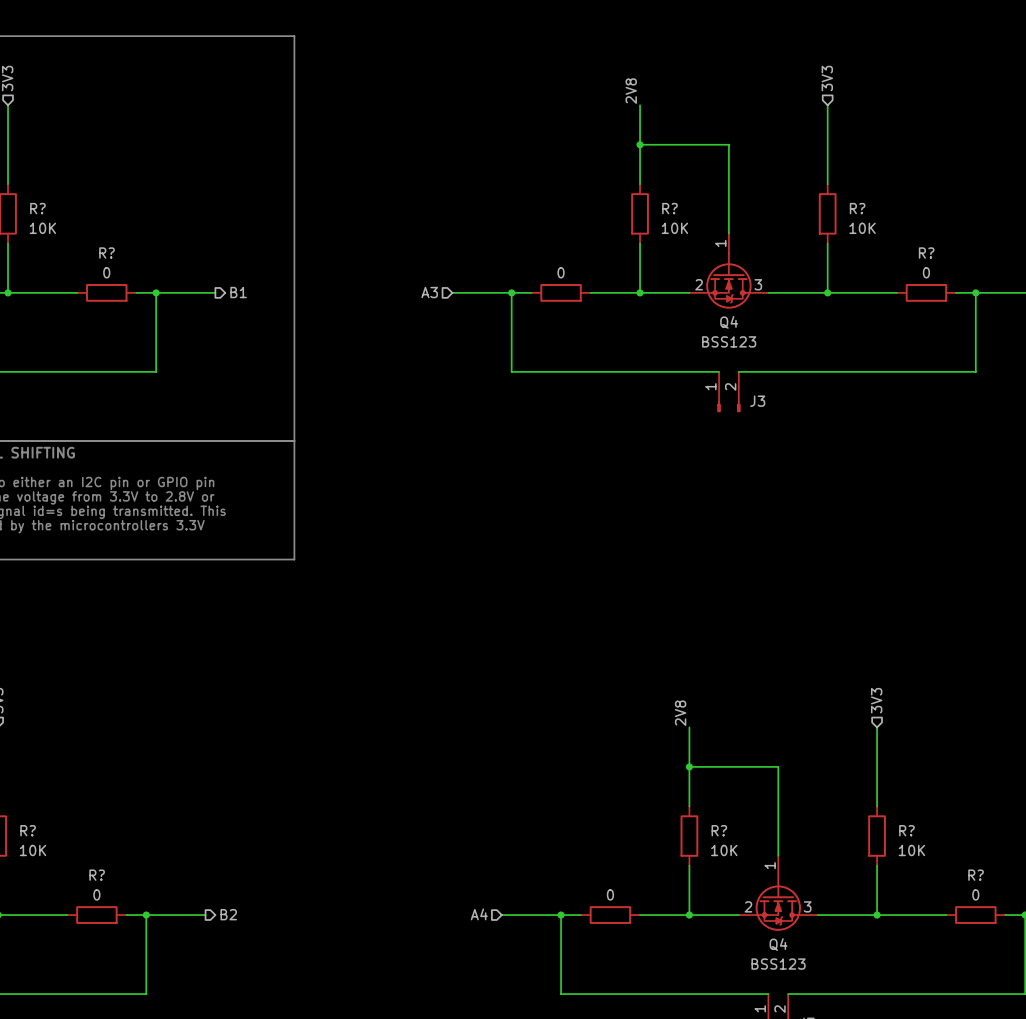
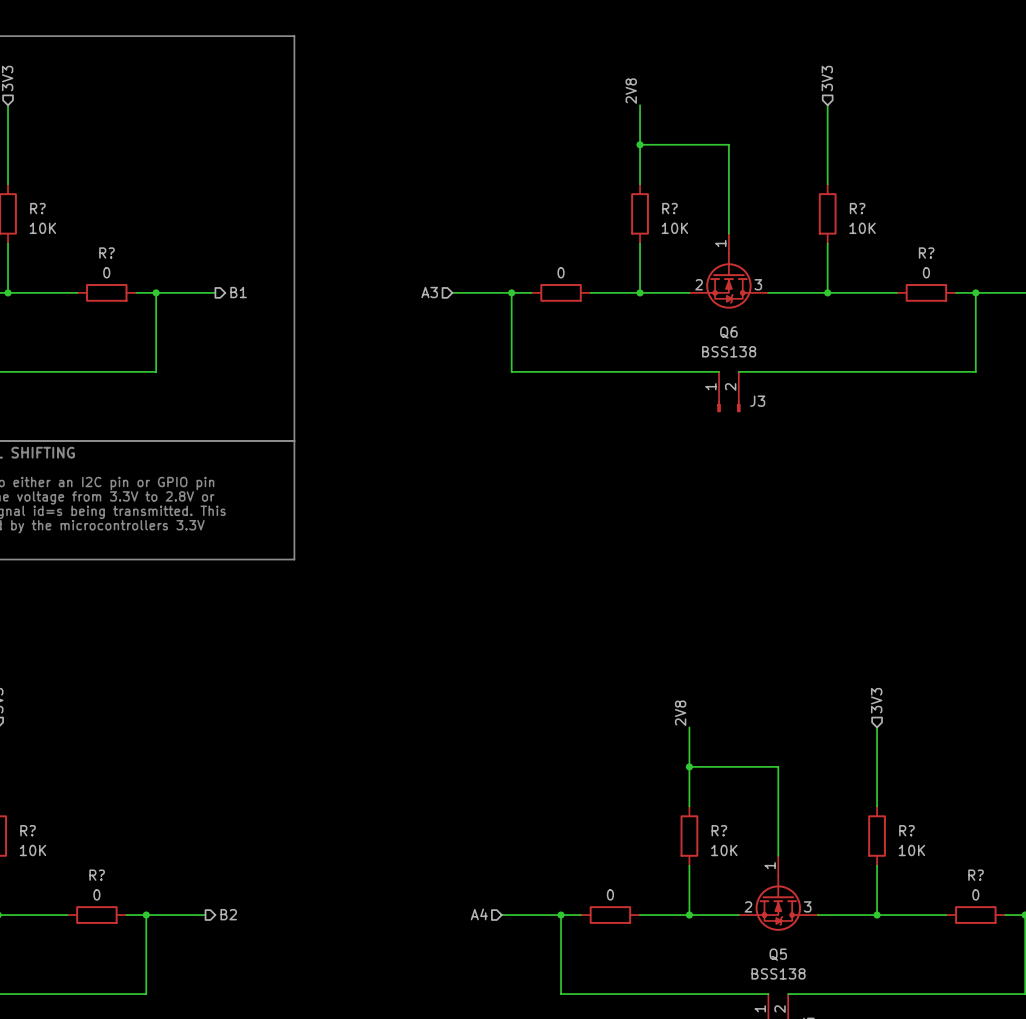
Q4 name: Q4 (729, 322) -> Q6 (728, 332)
Q4 value: BSS123 (729, 341) -> BSS138 (729, 351)
Q4 name: Q4 (778, 944) -> Q5 (778, 954)
Q4 value: BSS123 (778, 964) -> BSS138 (778, 973)

